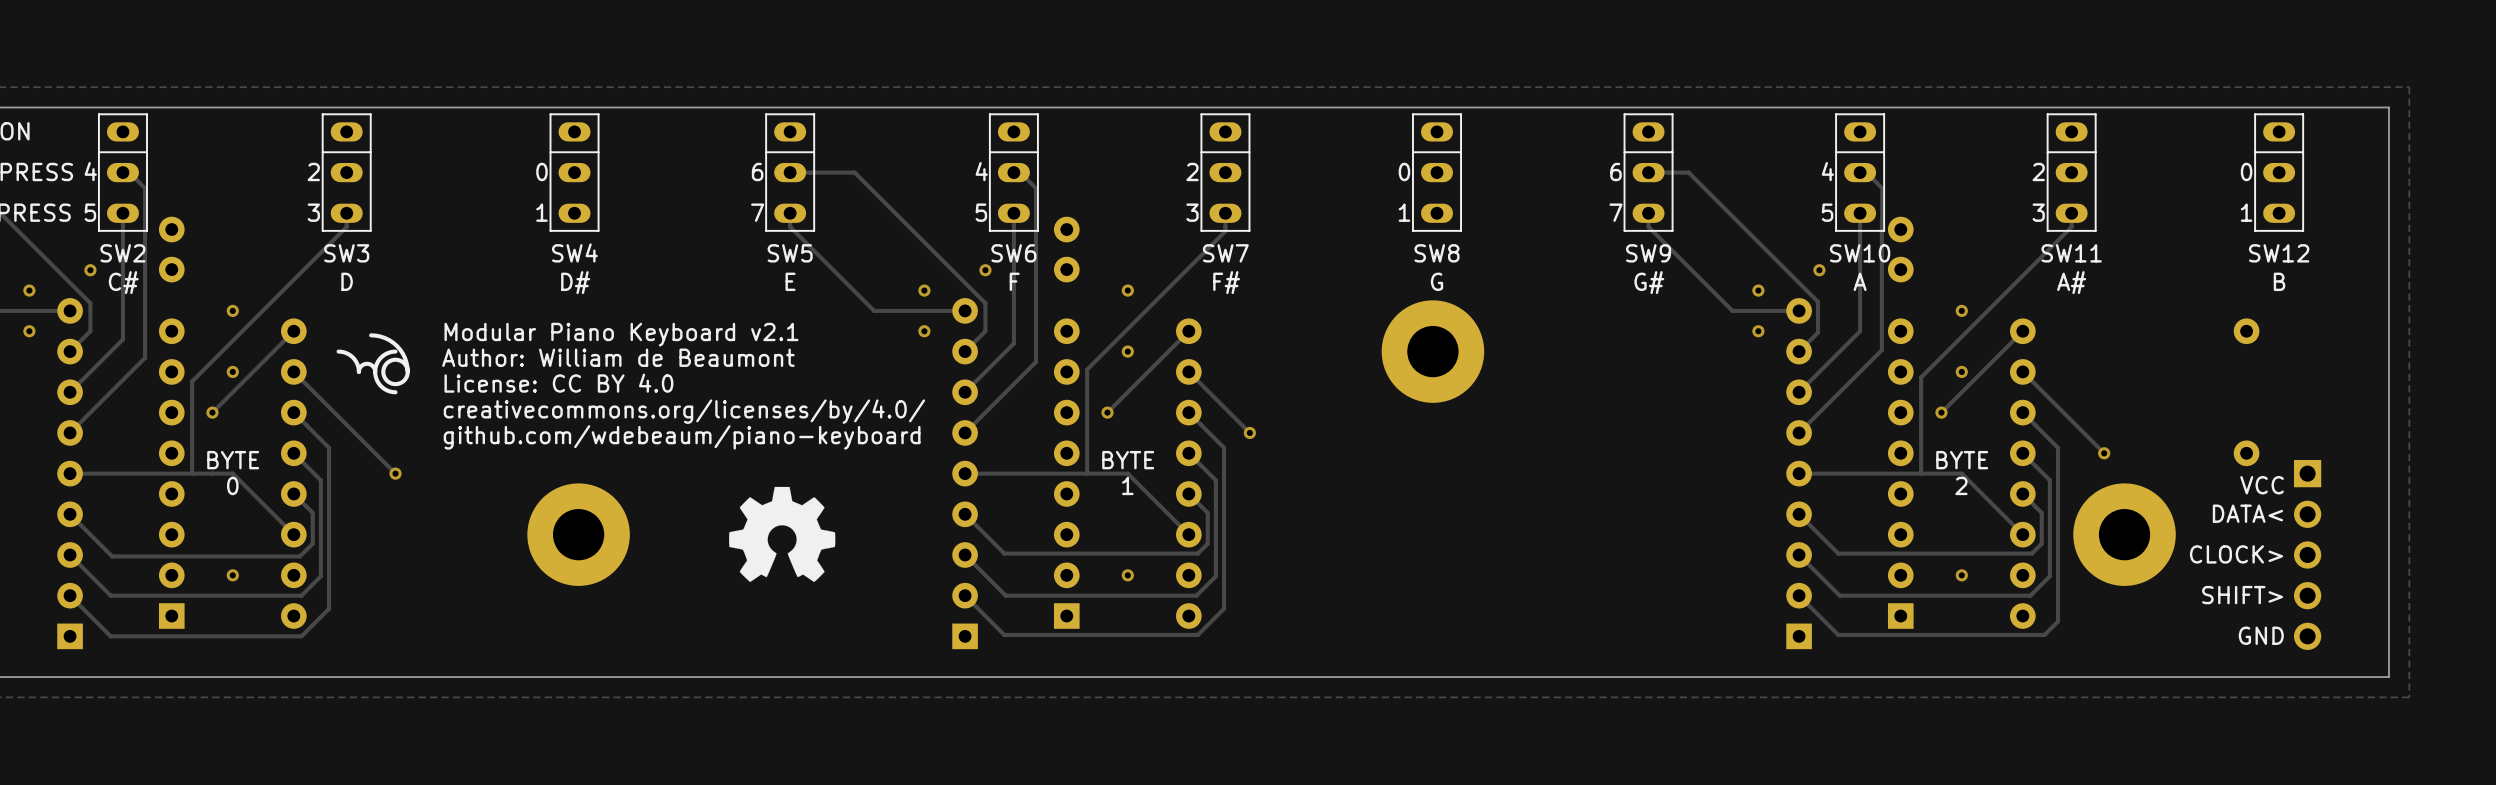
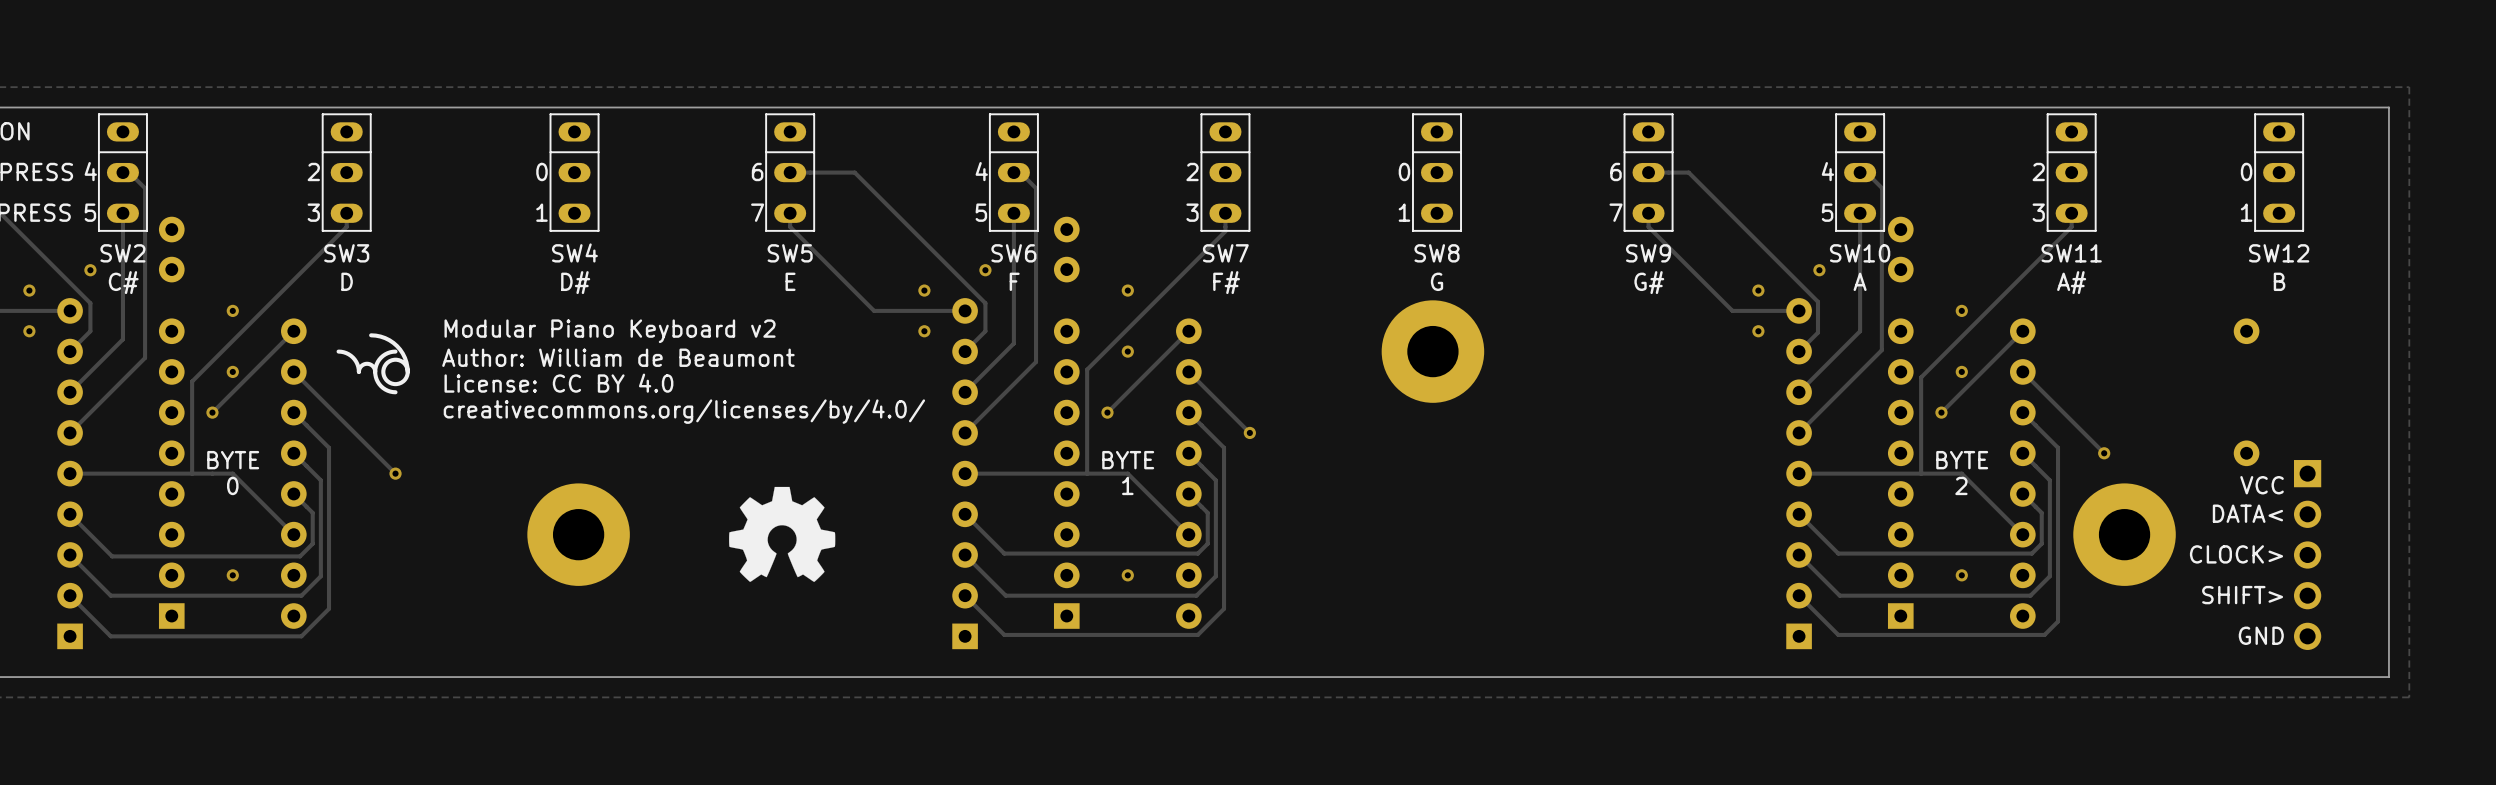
text: Modular Piano Keyboard v2.1 (621, 334) -> Modular Piano Keyboard v2 (610, 331)
text: github.com/wdebeaum/piano-keyboard (682, 437) -> none

